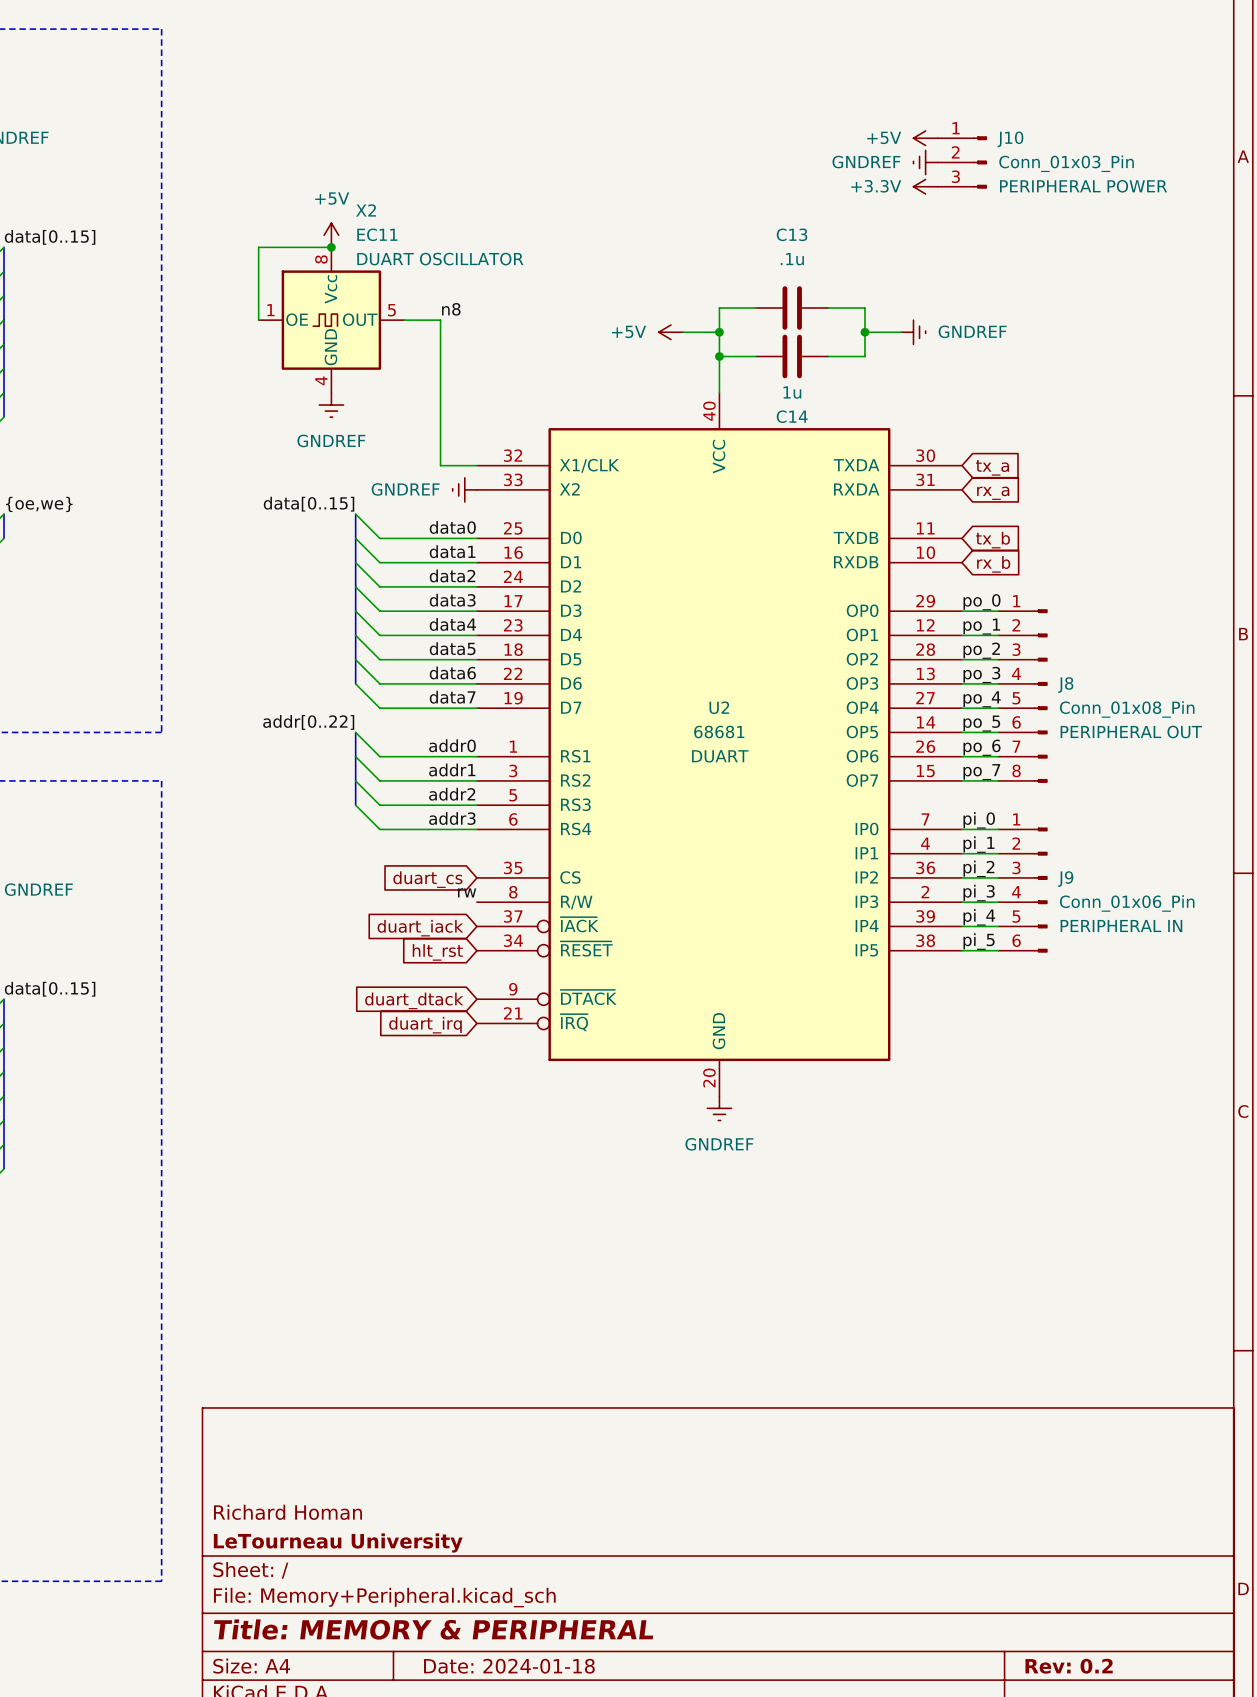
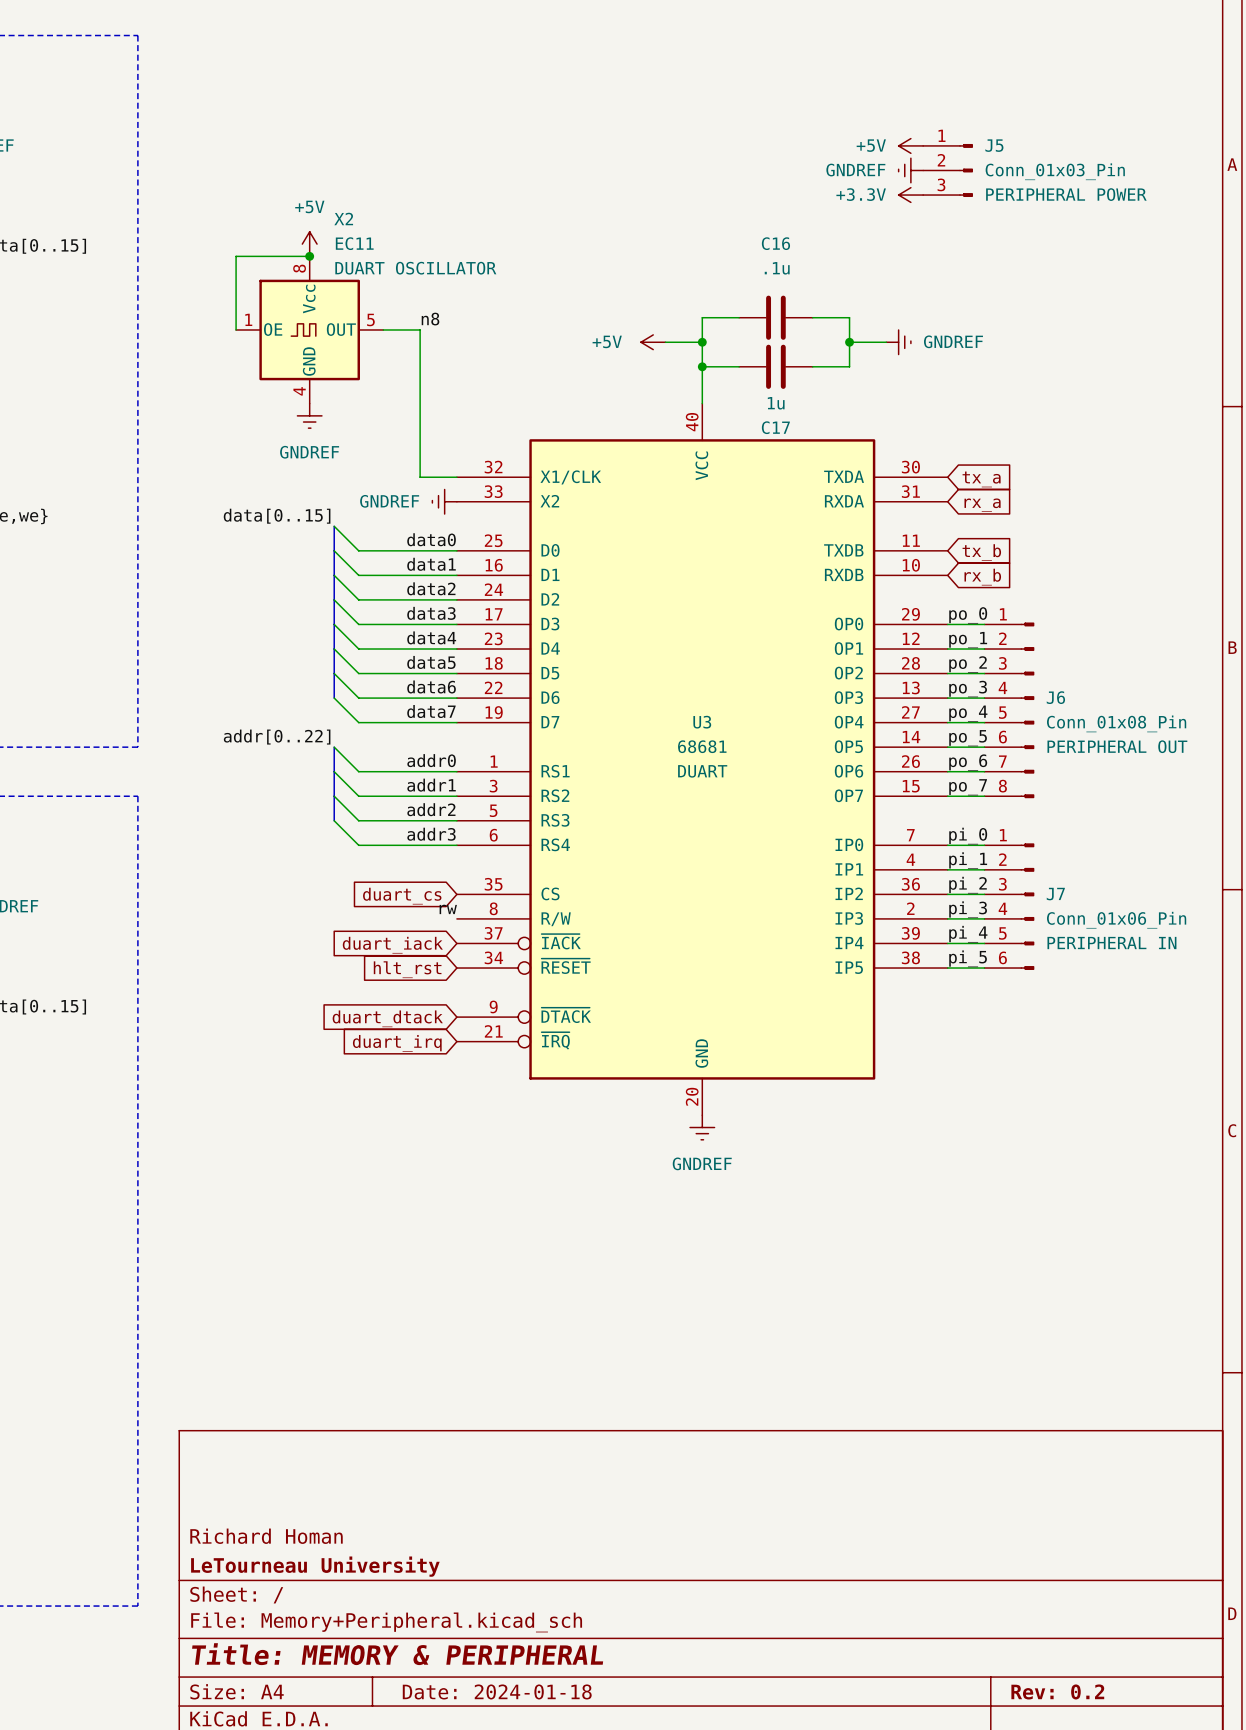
J10 name: J10 (1010, 139) -> J5 (994, 145)
C13 name: C13 (792, 234) -> C16 (775, 243)
C14 name: C14 (792, 416) -> C17 (775, 427)
J8 name: J8 (1065, 685) -> J6 (1055, 697)
U2 name: U2 (719, 707) -> U3 (702, 722)
J9 name: J9 (1065, 879) -> J7 (1055, 894)

